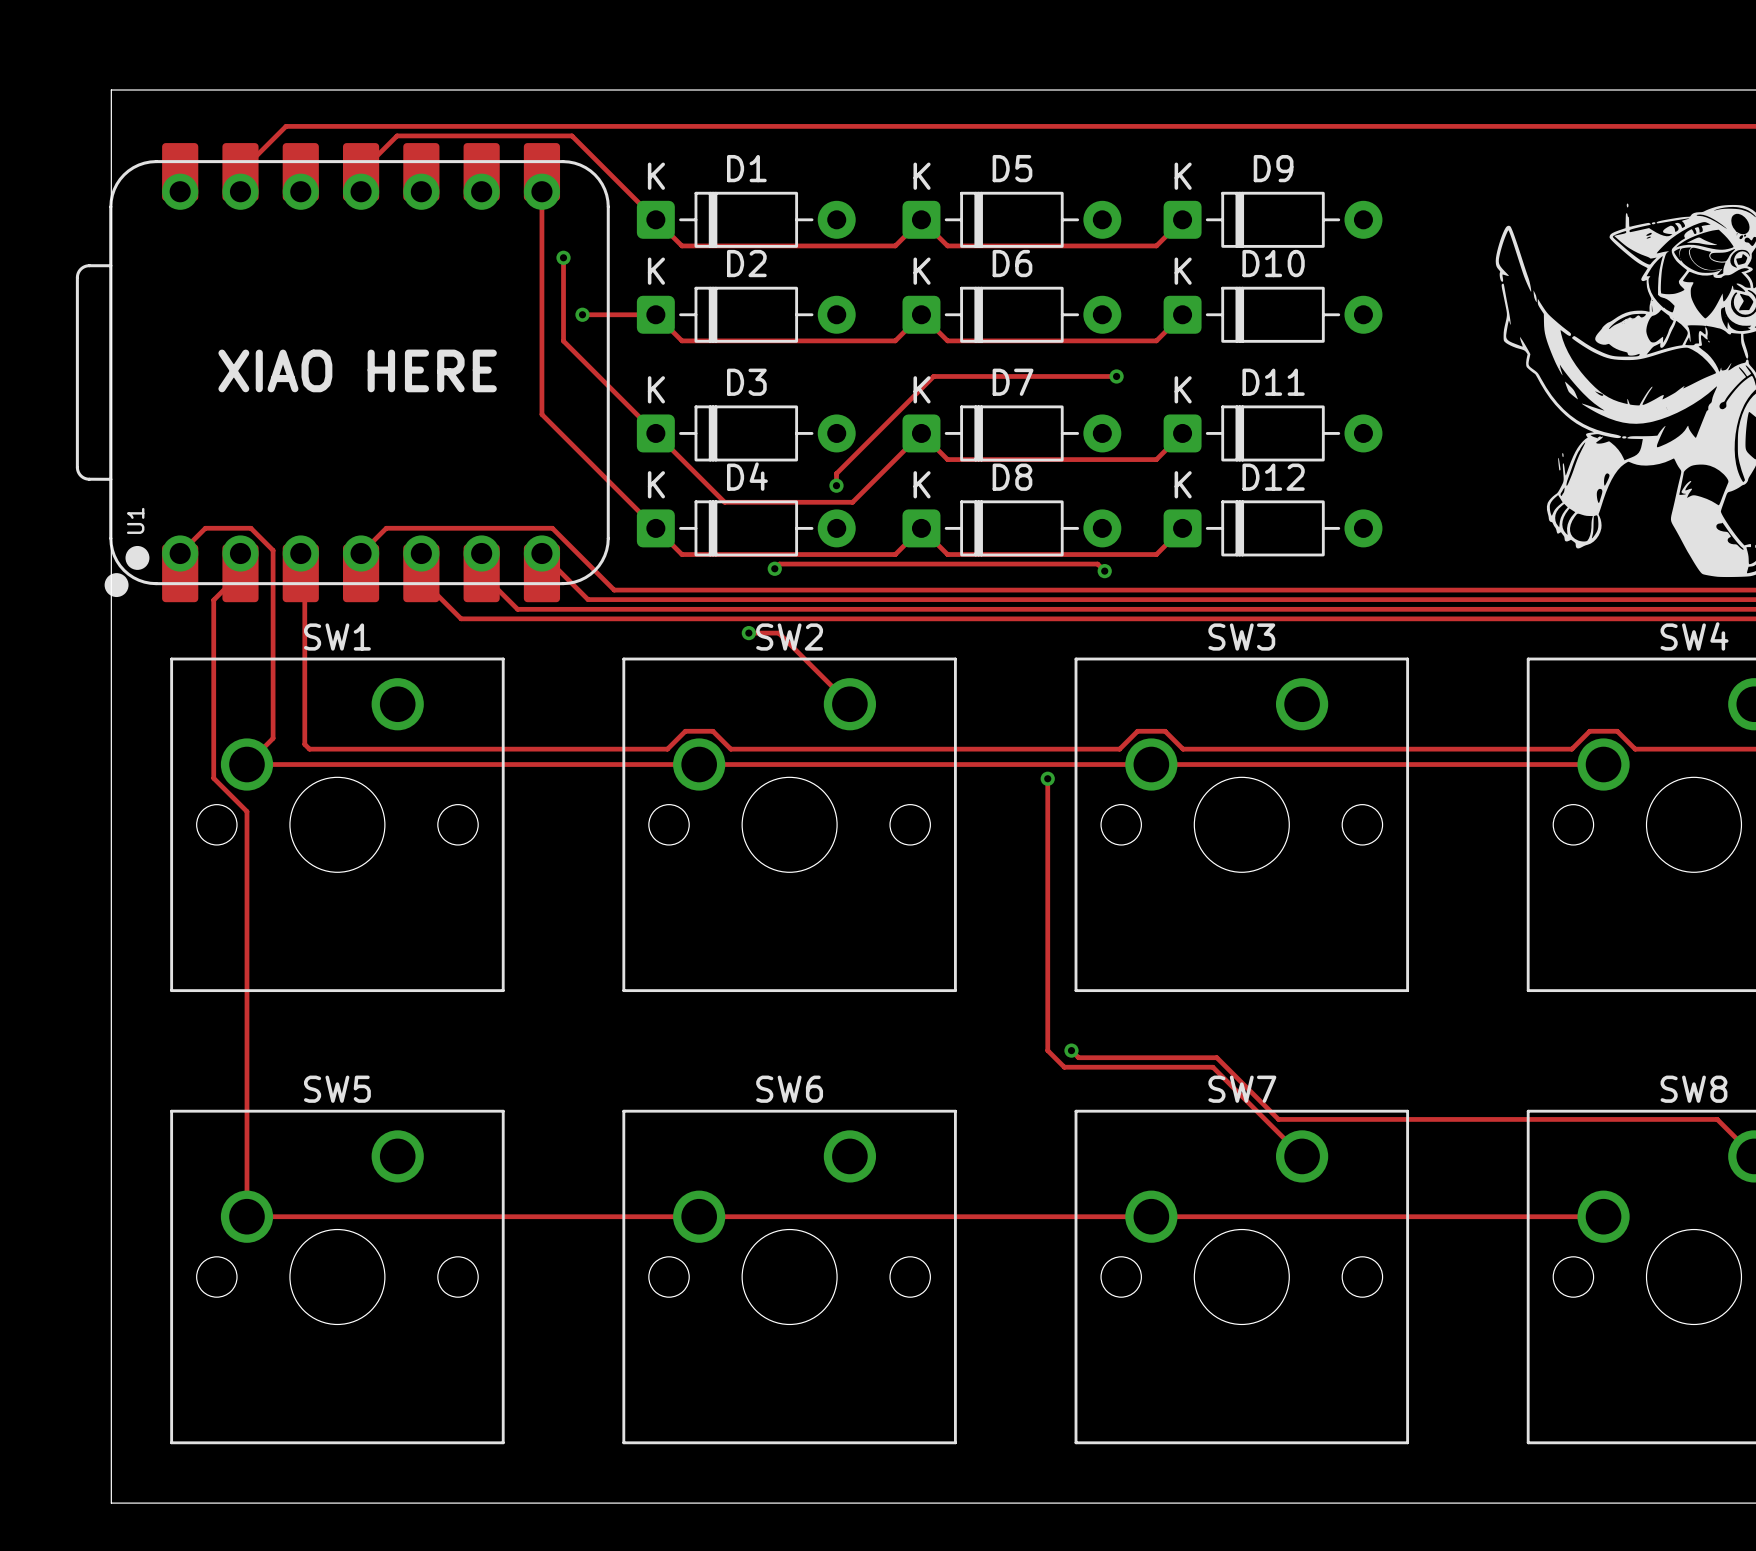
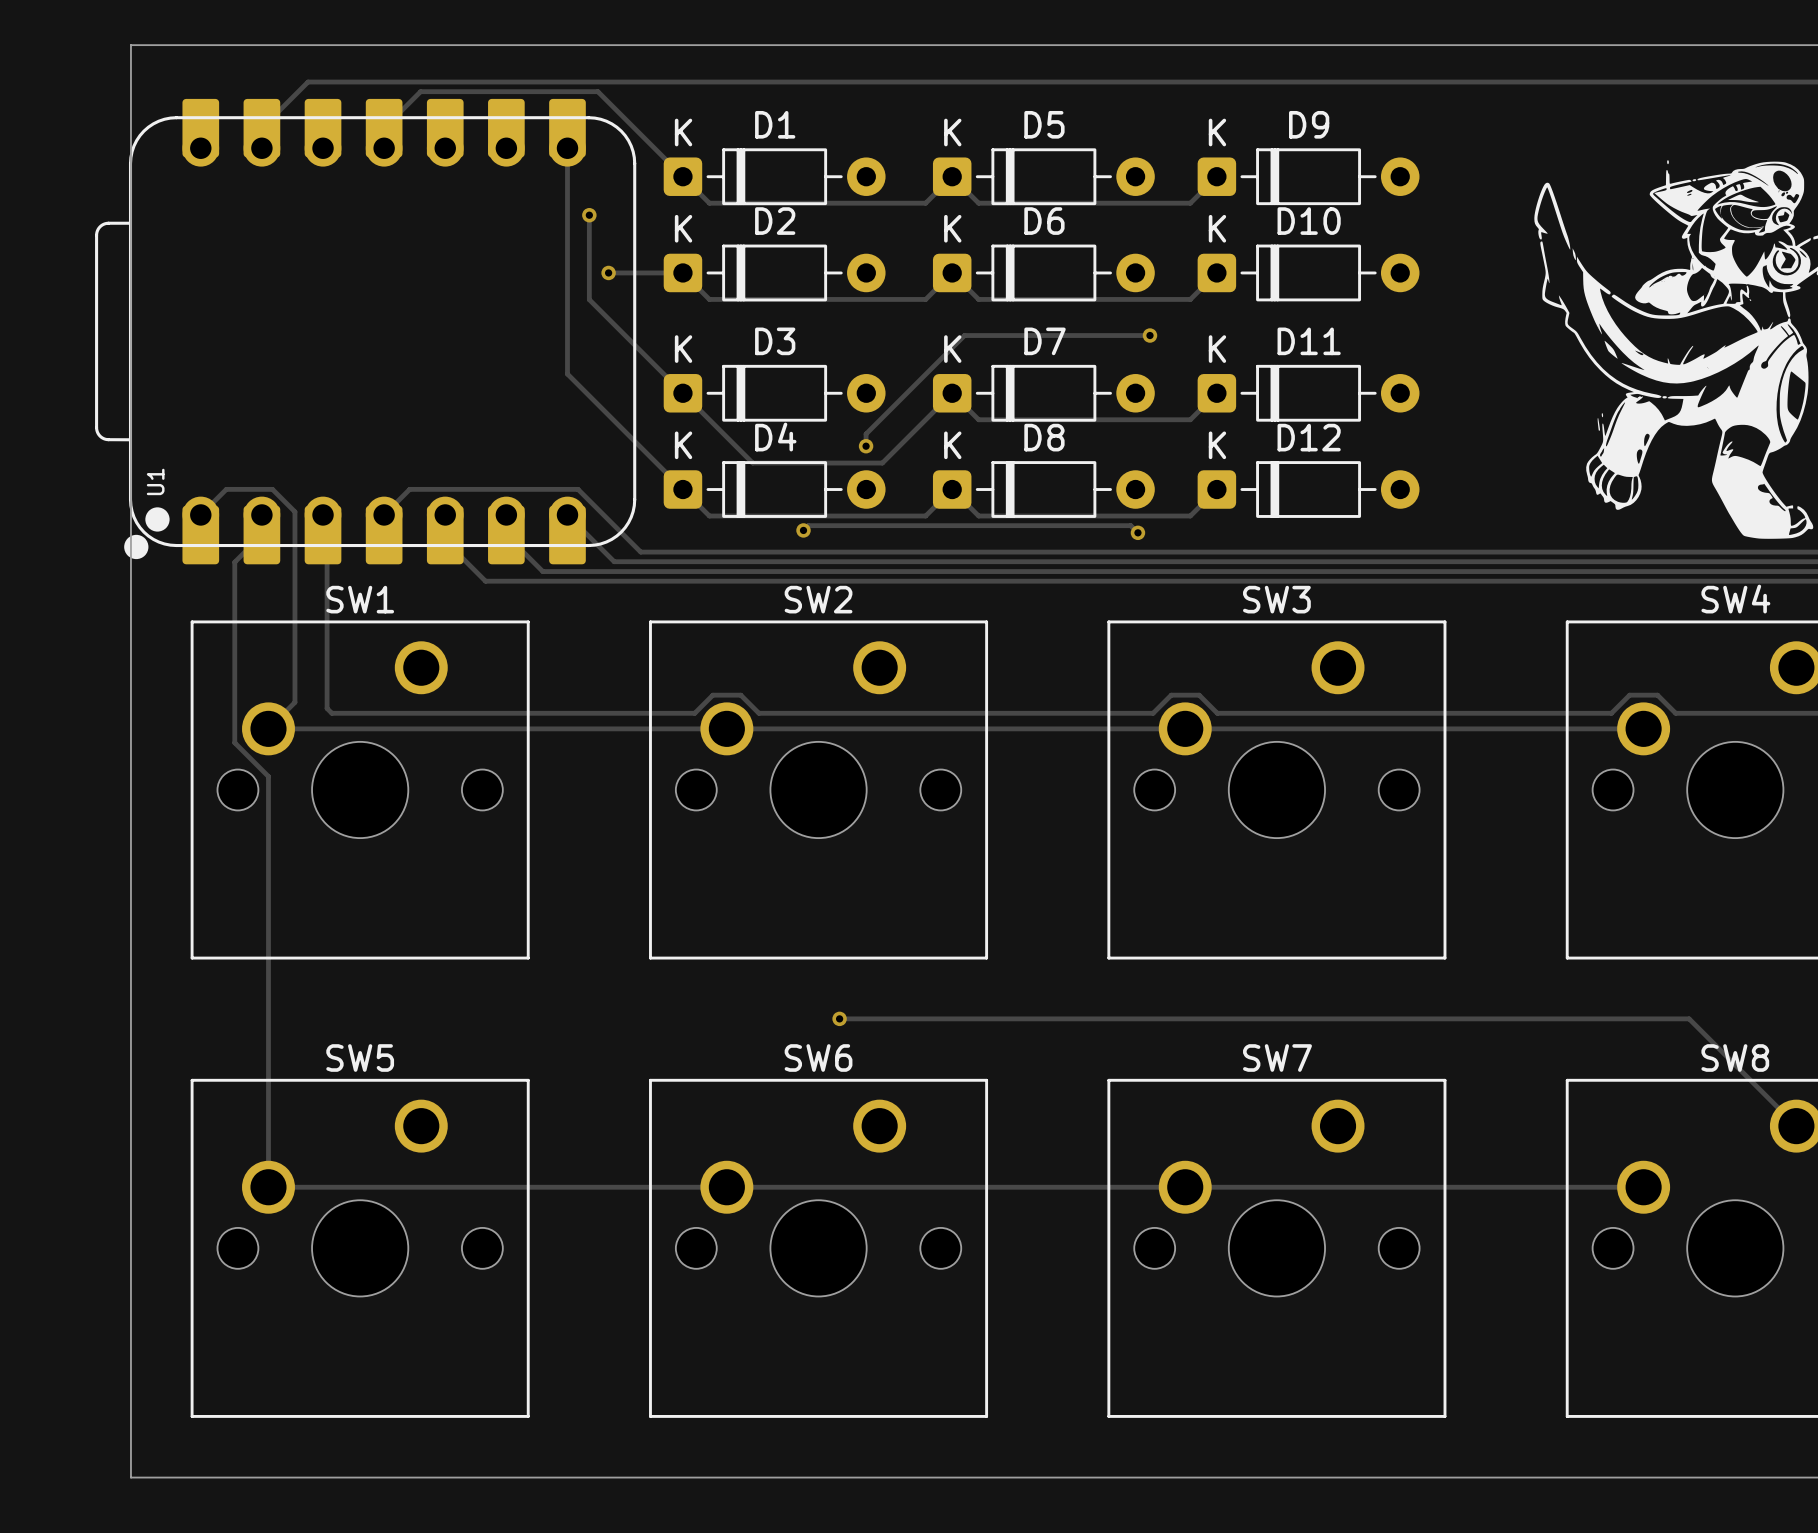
text: XIAO HERE (357, 370) -> none
track: (748, 633) (778, 633) (849, 704) -> none
via: (748, 633) -> none
track: (1047, 778) (1047, 1050) (1064, 1067) (1212, 1067) (1302, 1156) -> none
via: (1047, 778) -> none
via: none -> (839, 1018)
track: (1071, 1050) (1078, 1057) (1216, 1057) (1278, 1119) (1717, 1119) -> (839, 1018) (1689, 1018) (1758, 1088)
via: (1071, 1050) -> none

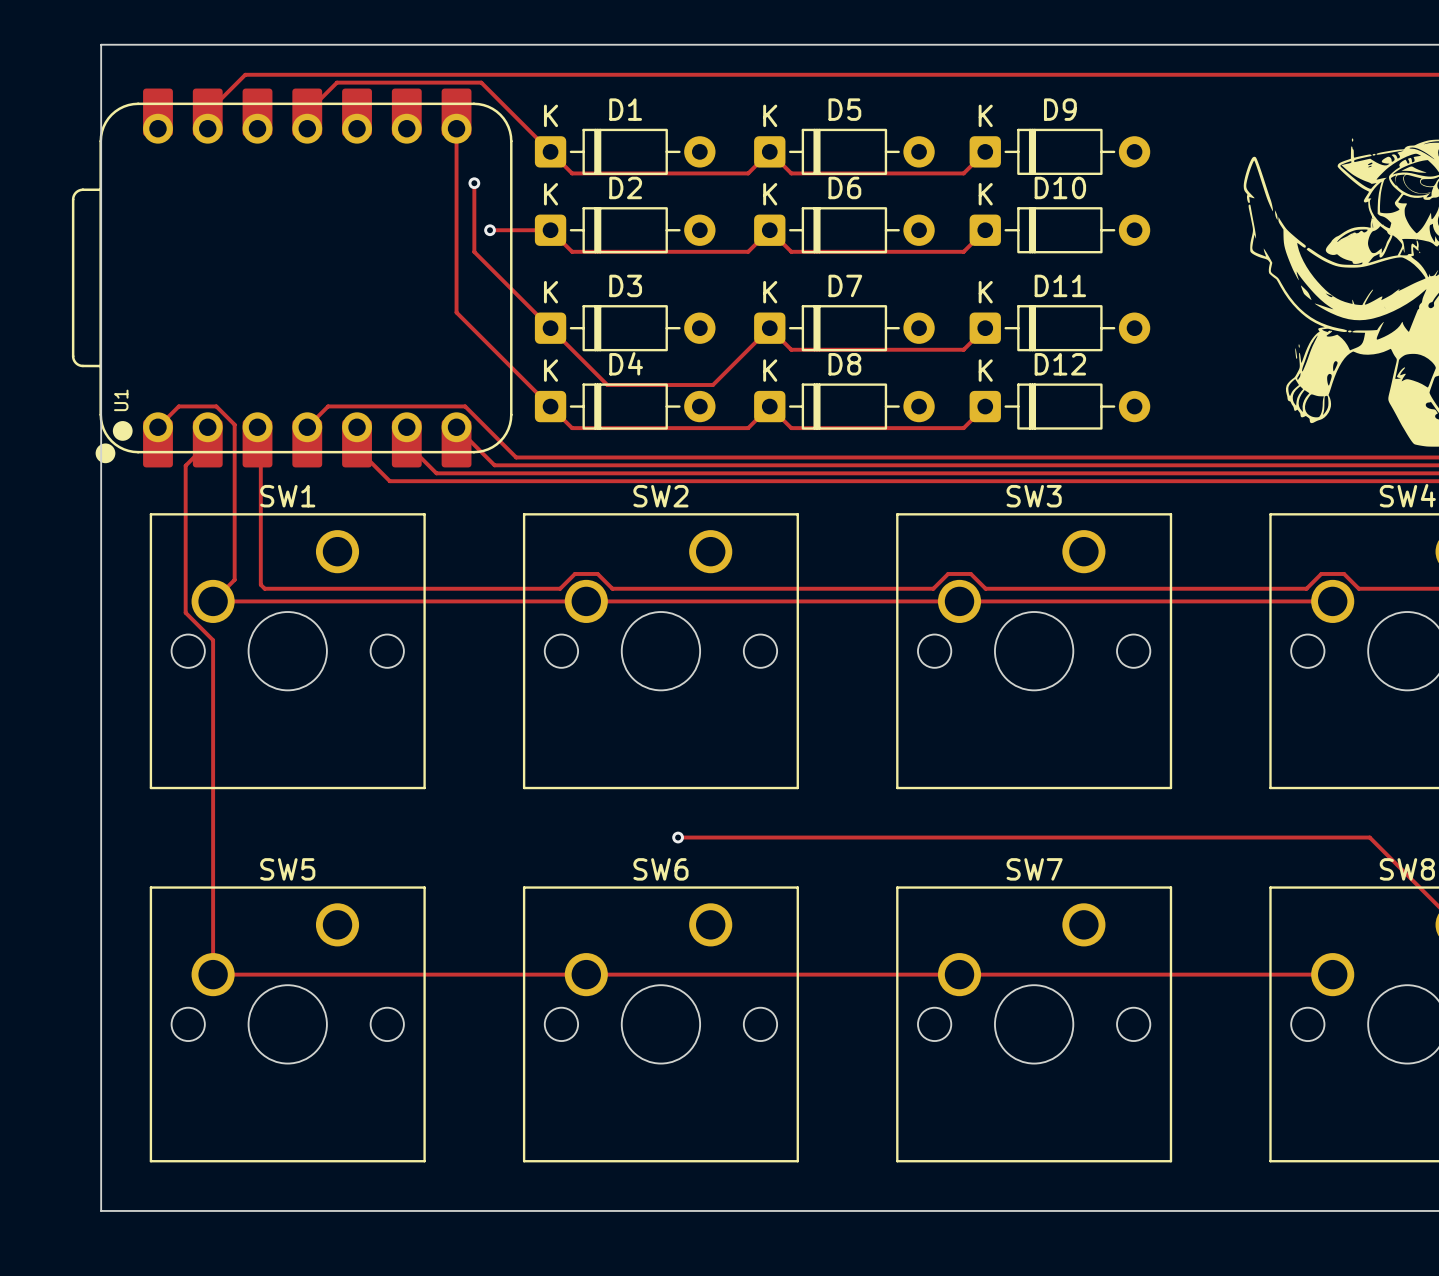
track: (1149, 335) (964, 335) (866, 434) (866, 446) -> none
via: (1149, 335) -> none
via: (866, 446) -> none
track: (803, 530) (808, 525) (1130, 525) (1137, 532) -> none
via: (803, 530) -> none
via: (1137, 532) -> none

